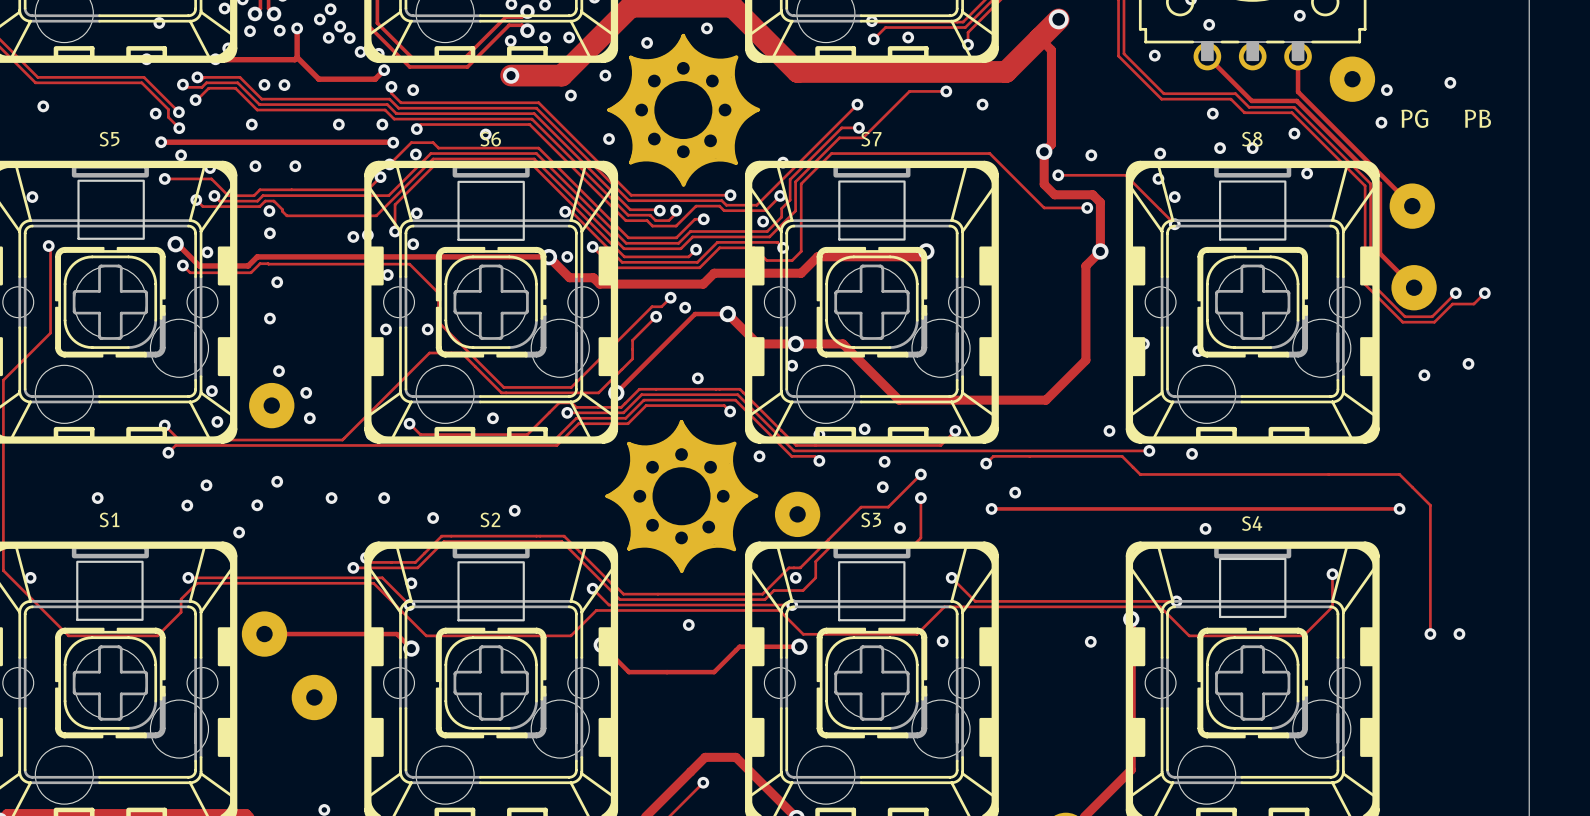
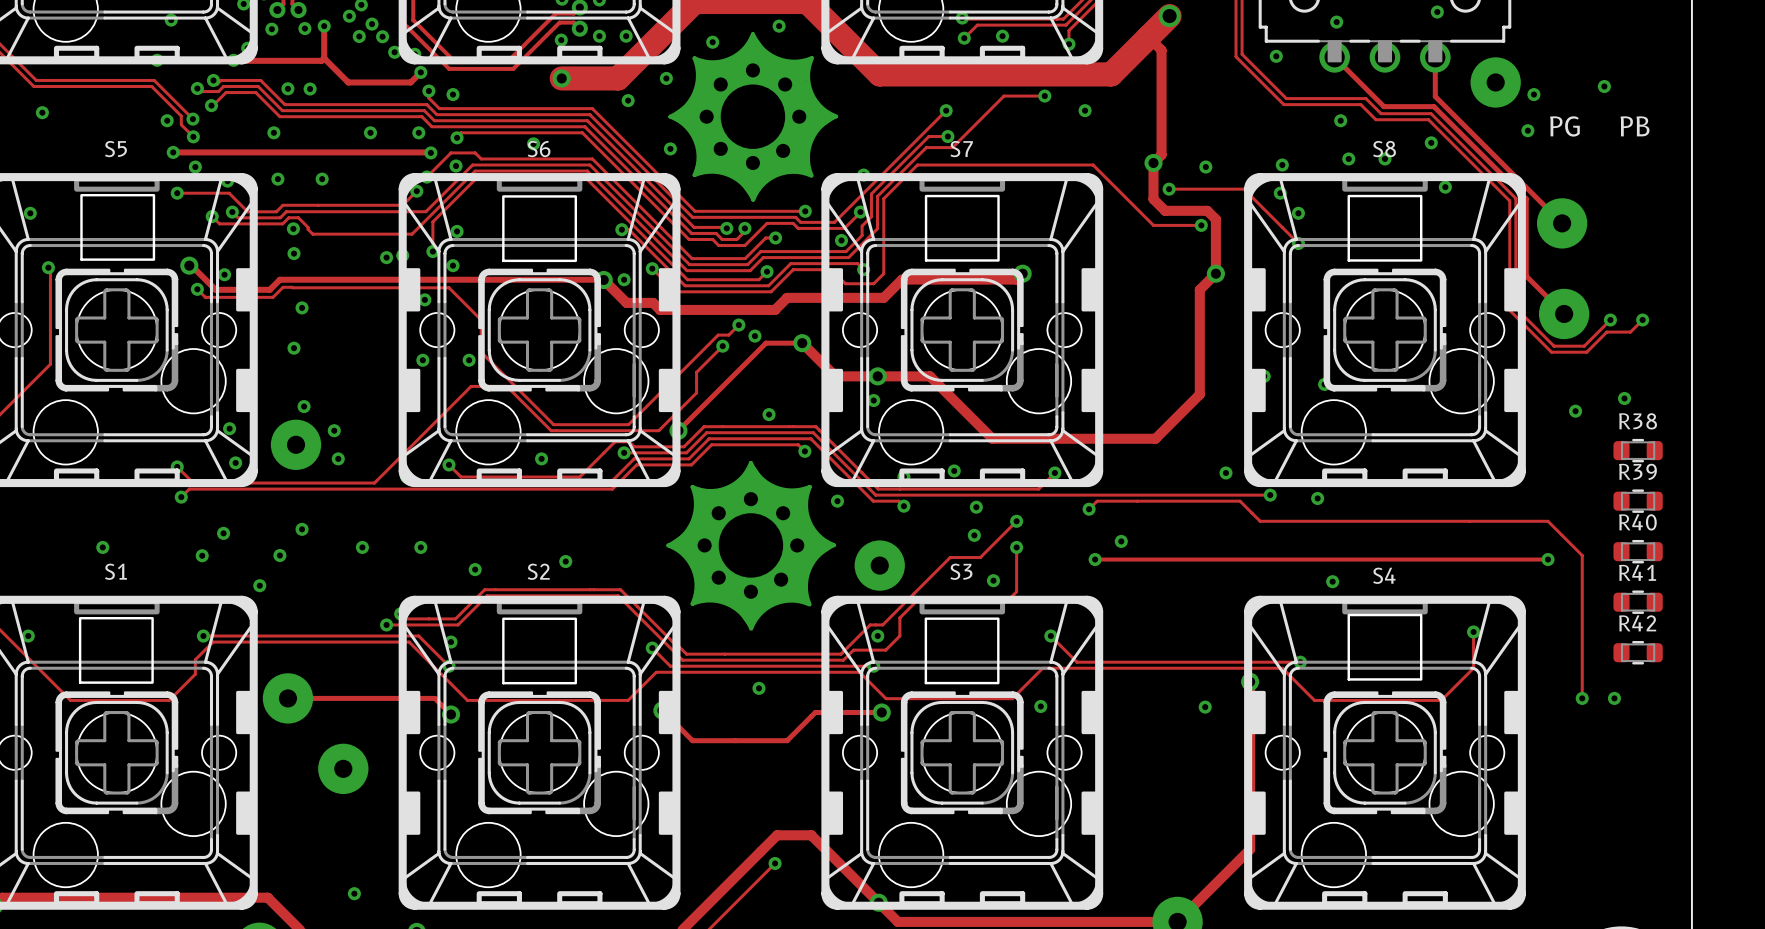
R38: none -> (1638, 450)
R39: none -> (1638, 501)
R40: none -> (1638, 551)
R41: none -> (1638, 602)
R42: none -> (1638, 652)

